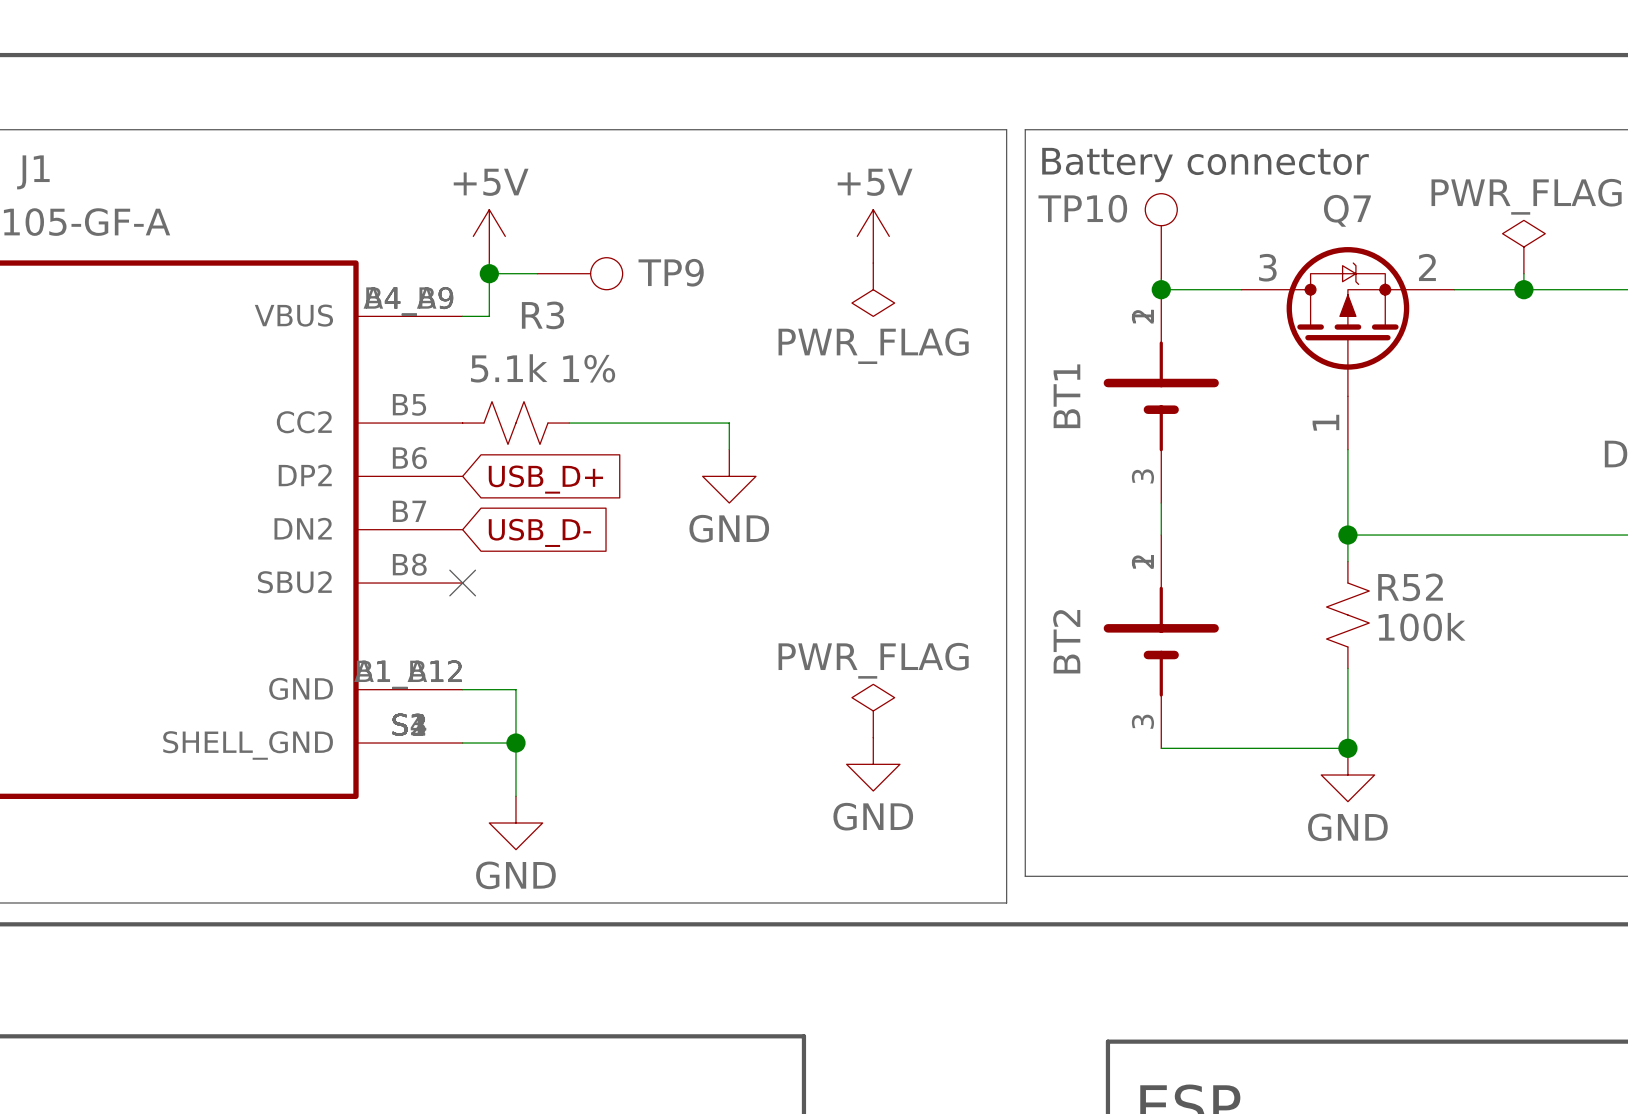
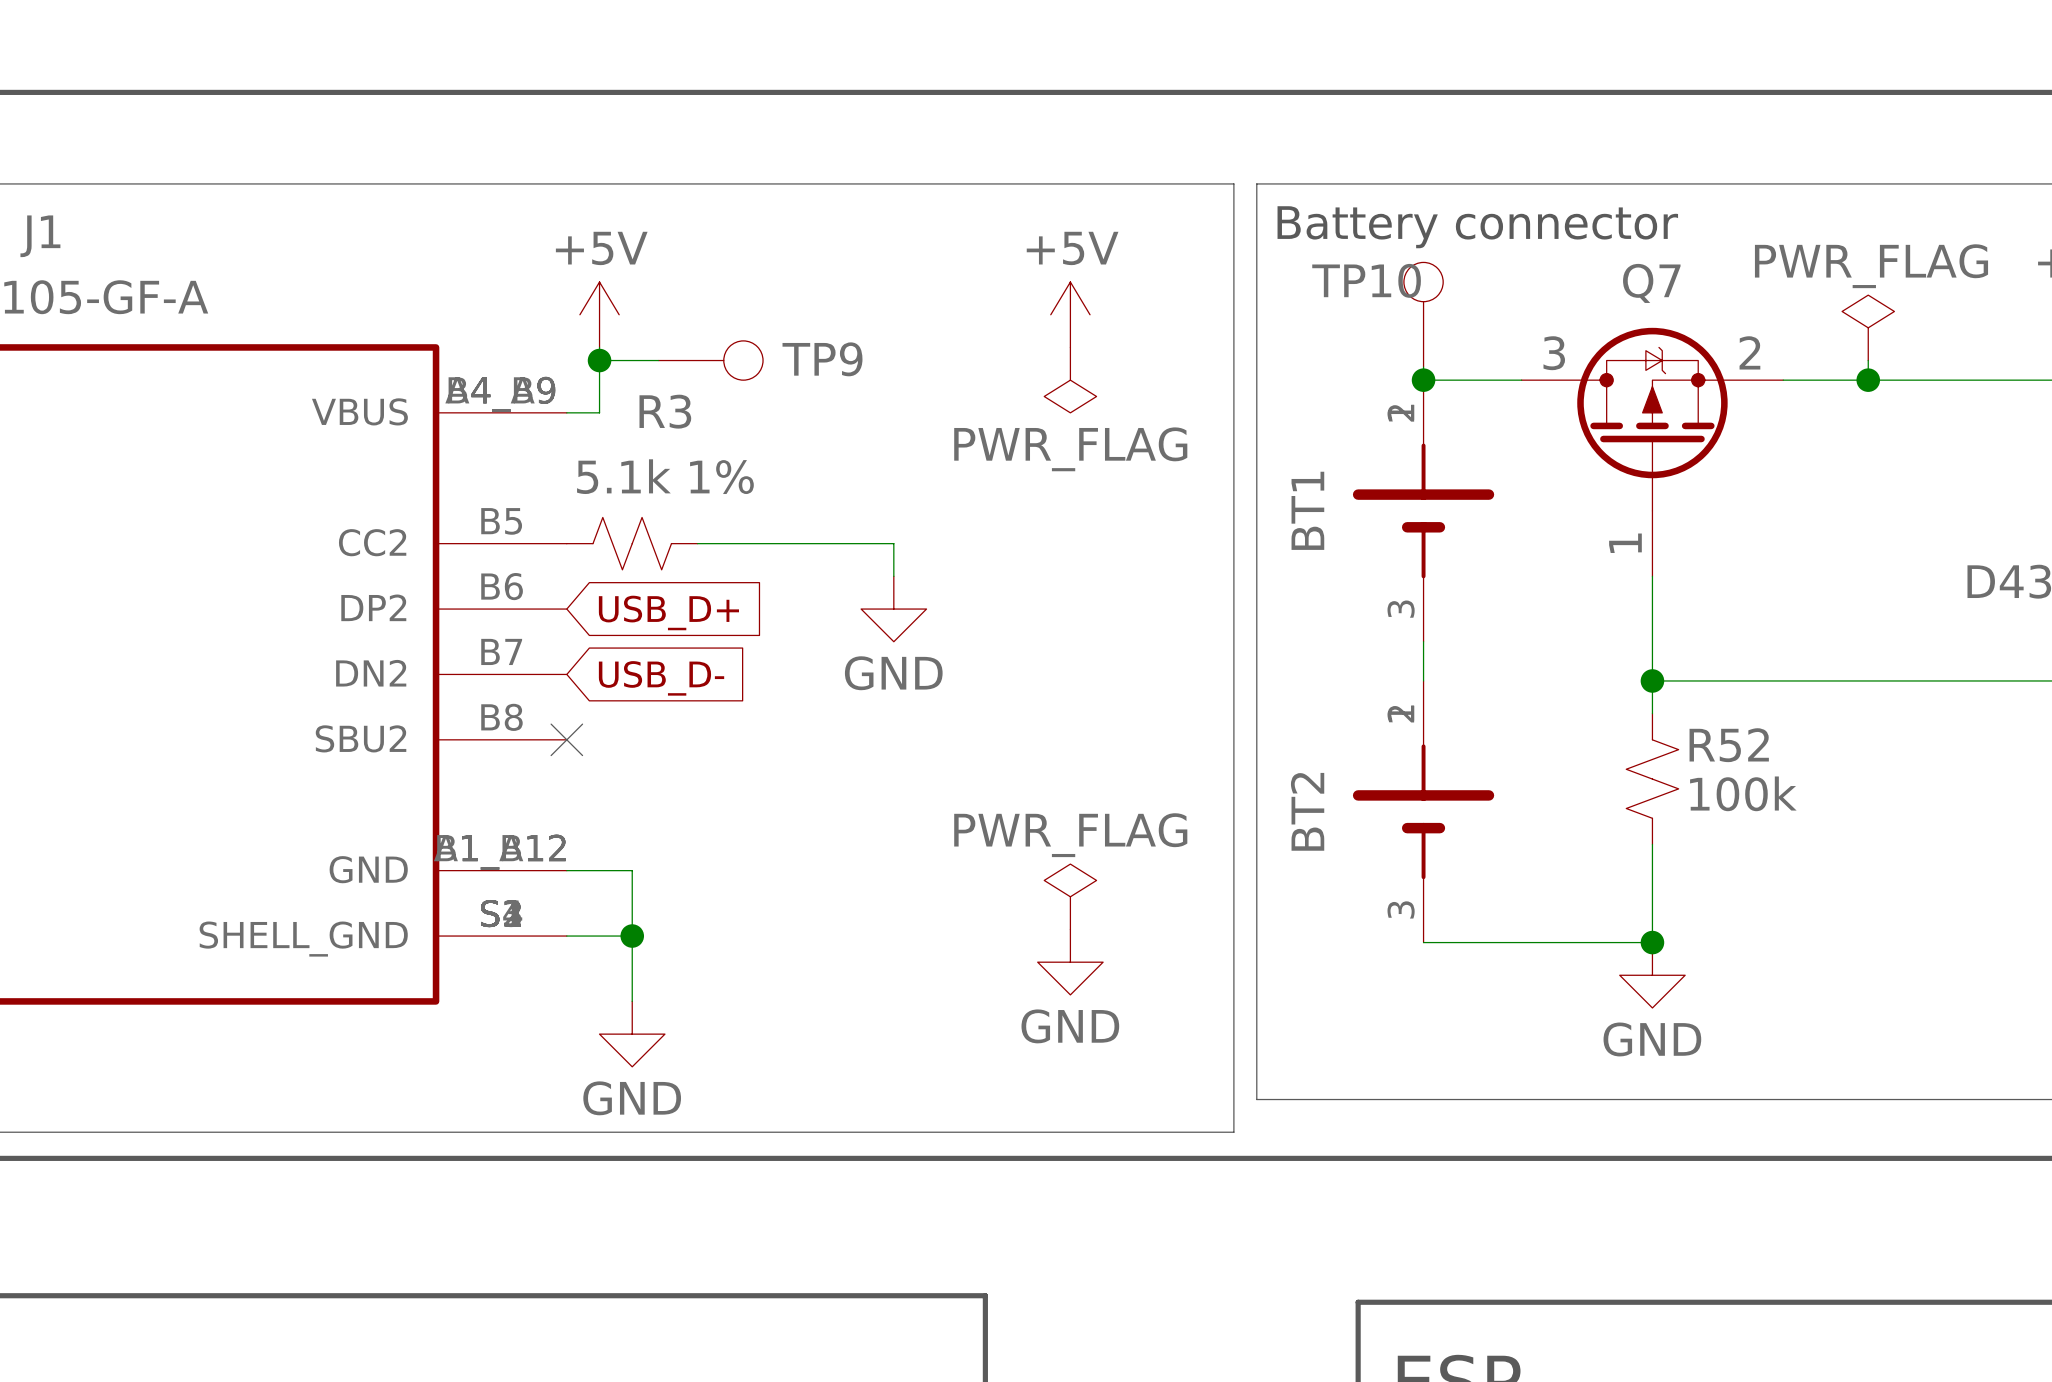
TP10 name position: TP10 (1082, 208) -> TP10 (1366, 280)

